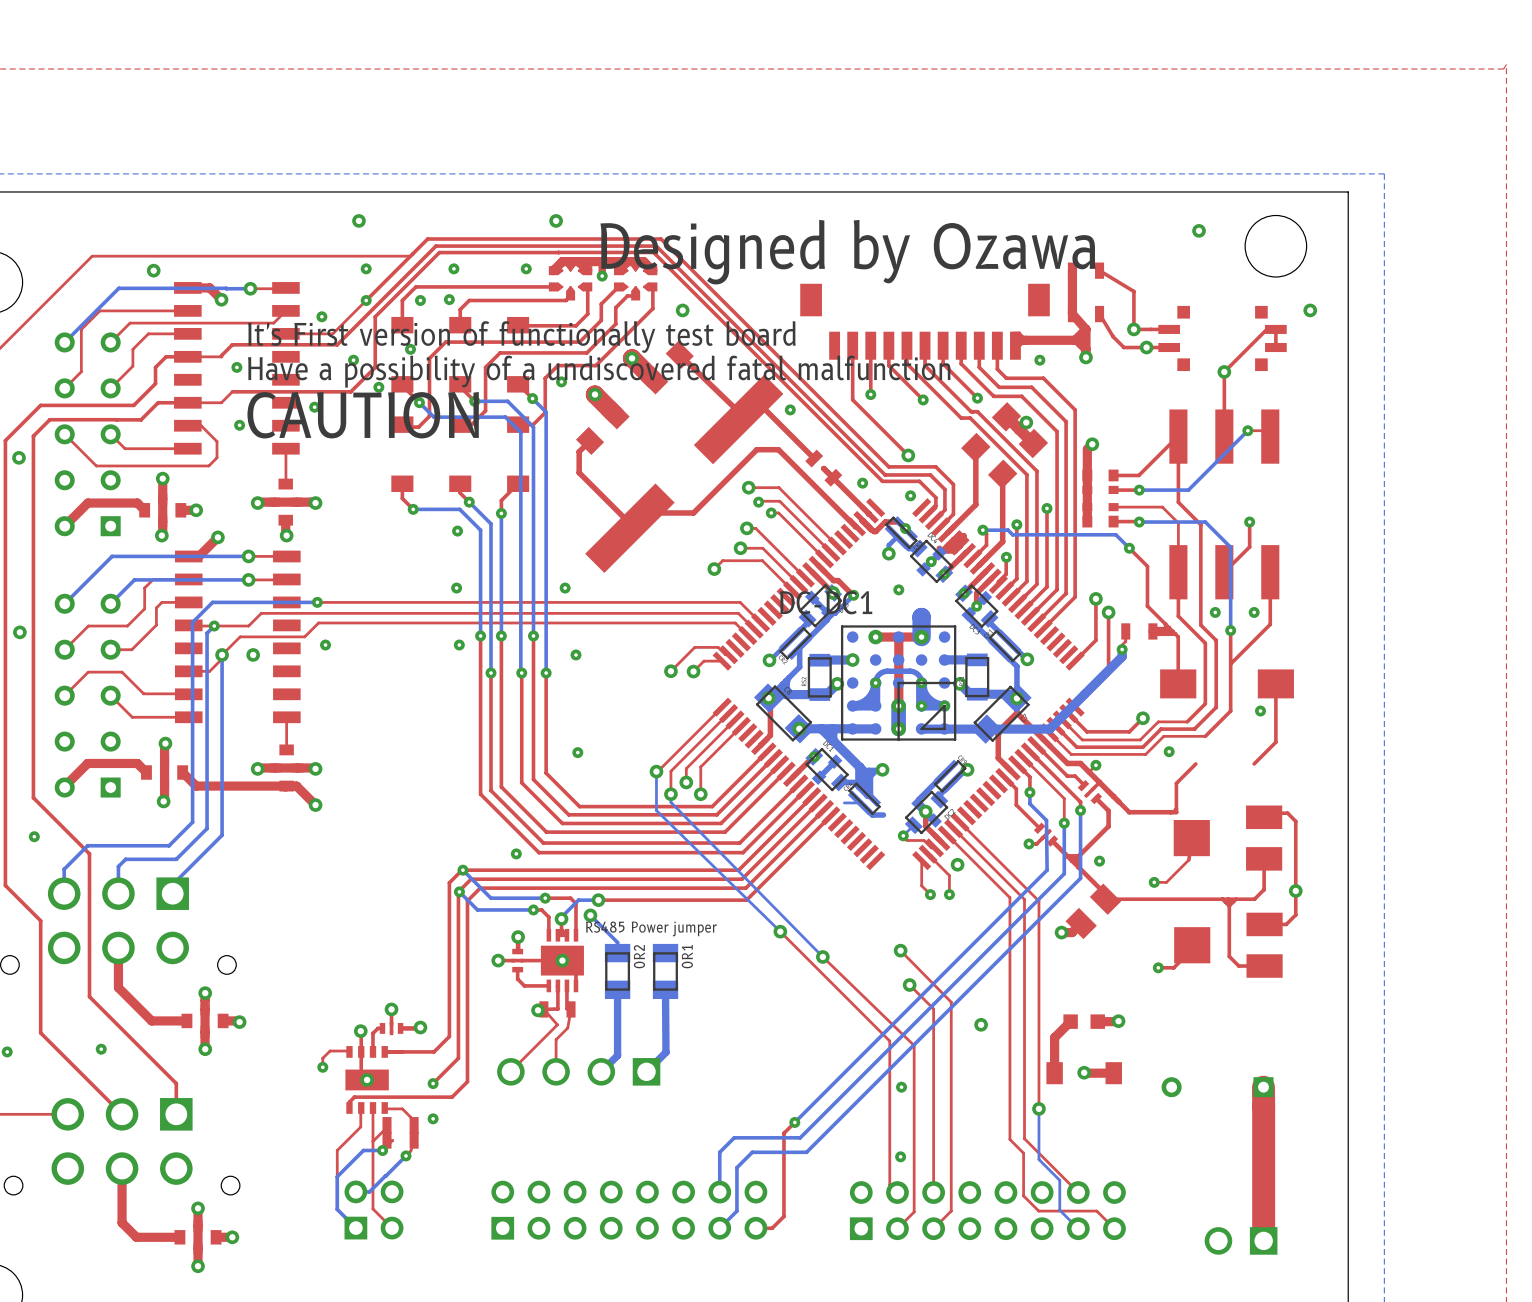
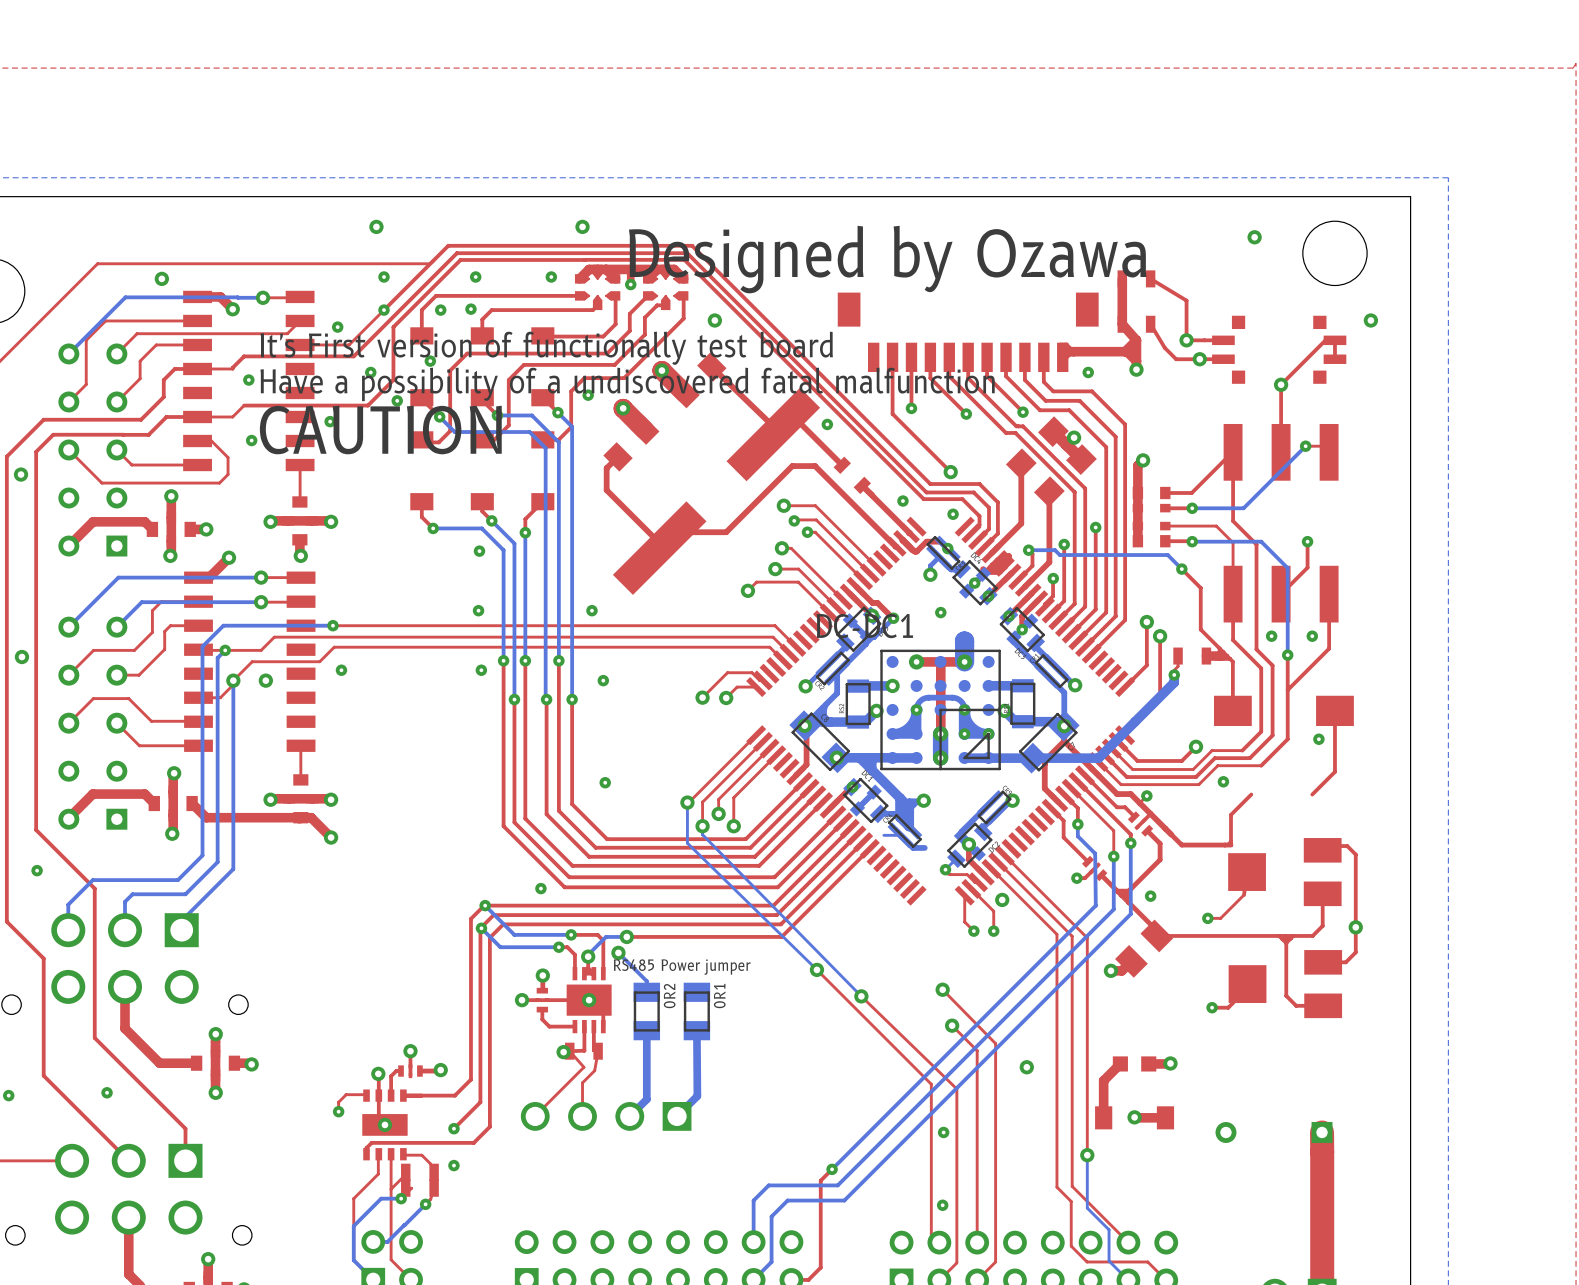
top track: (804, 448) (814, 458) -> none
part footprint: [805, 449, 843, 487] -> [833, 456, 872, 495]

